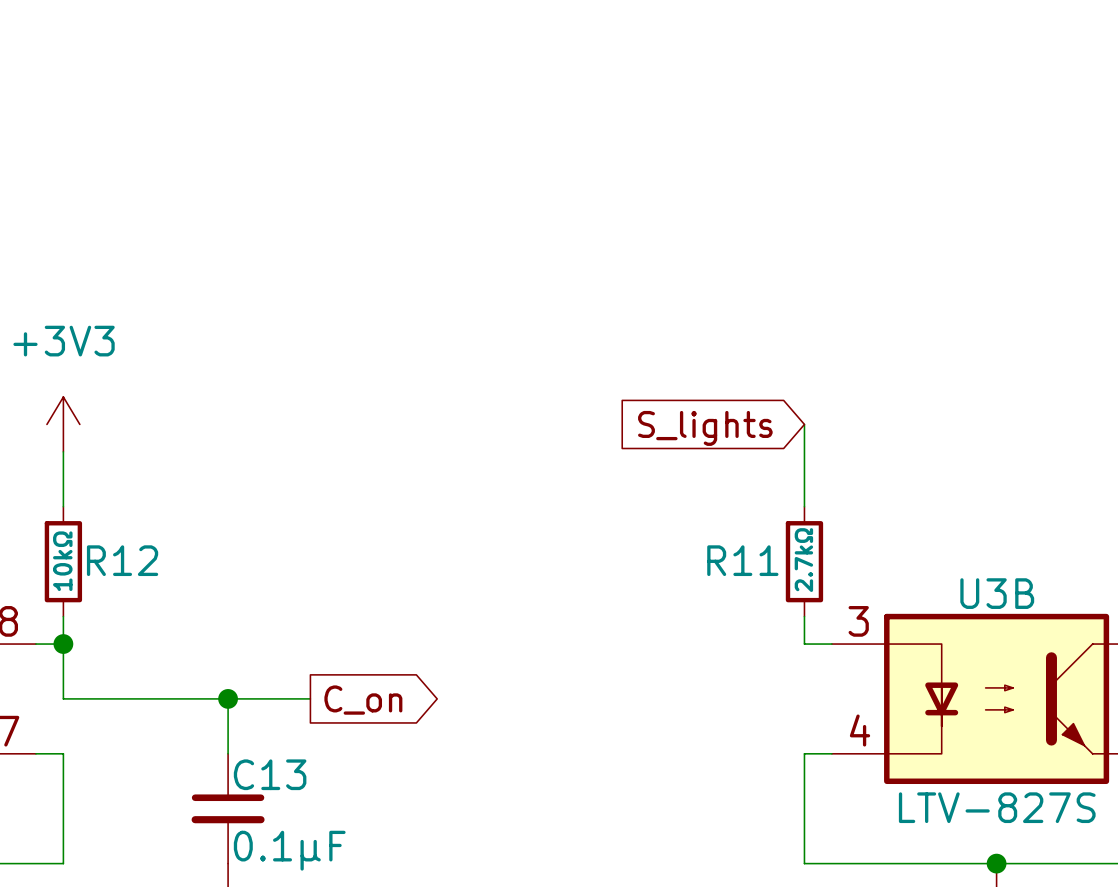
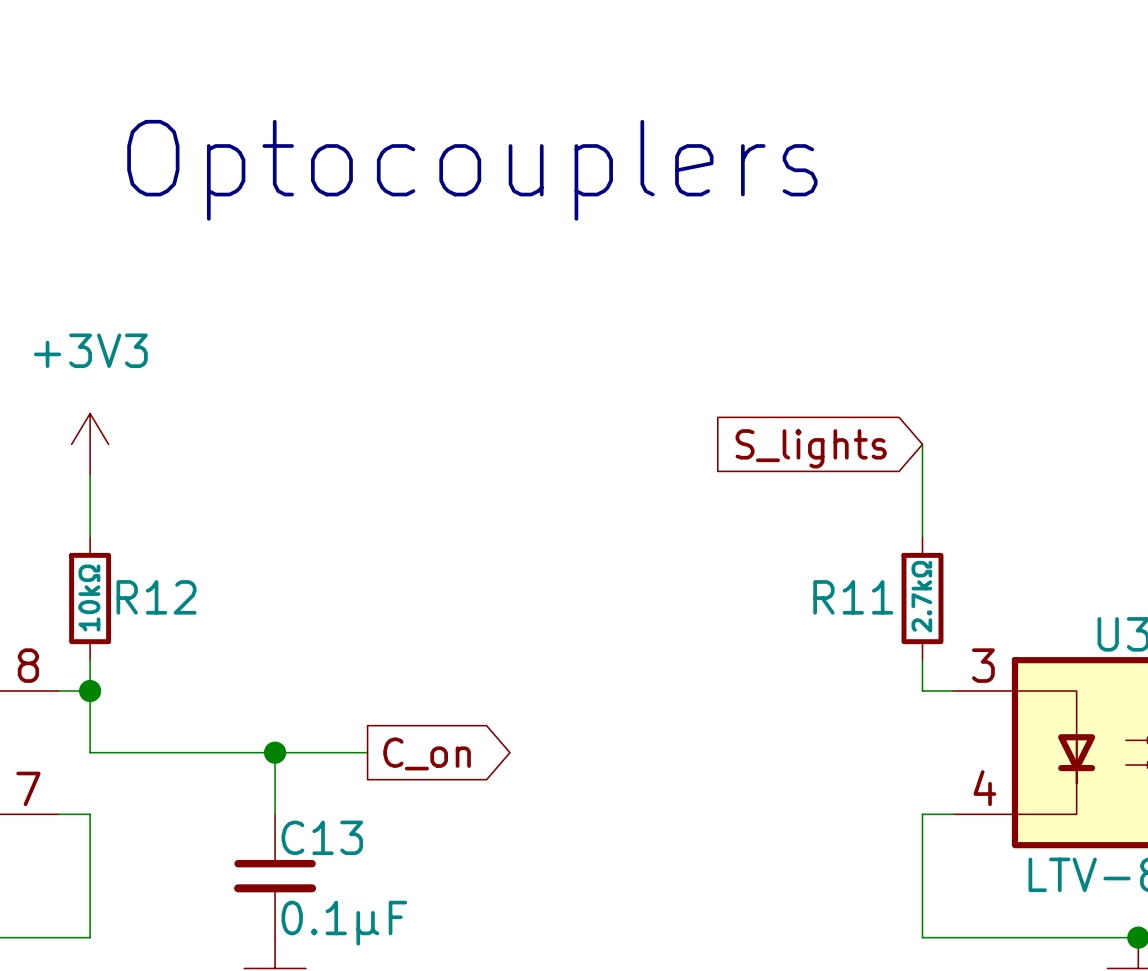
text: none -> Optocouplers (472, 170)

